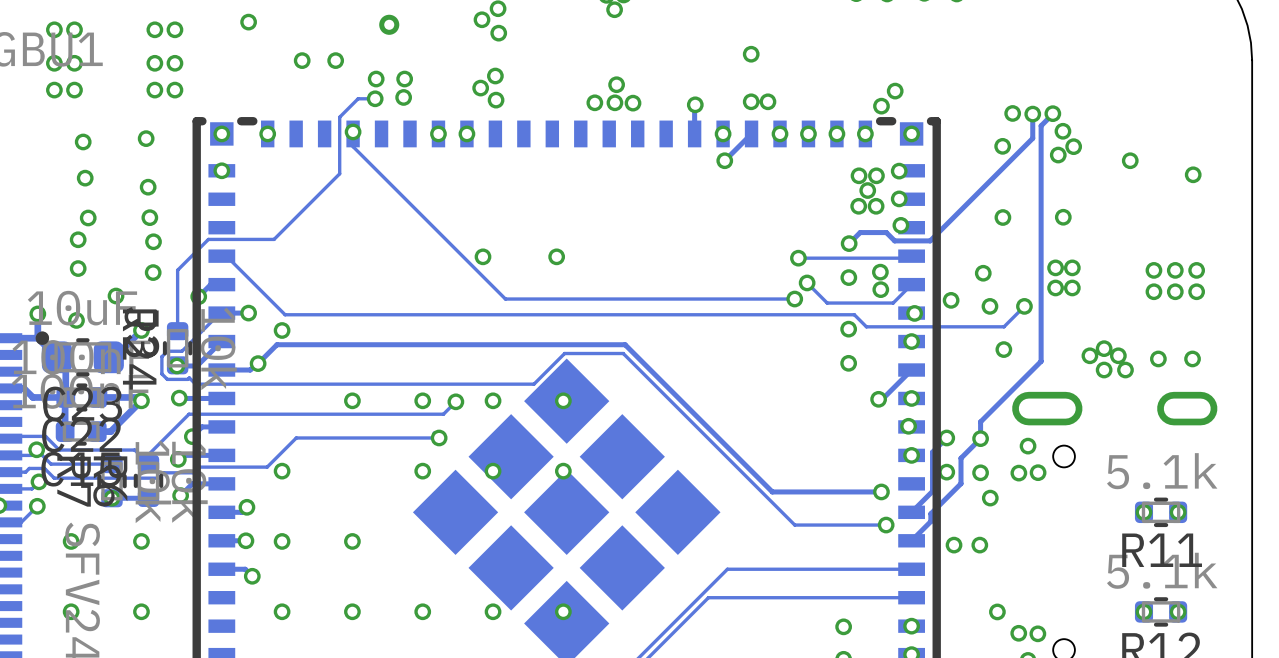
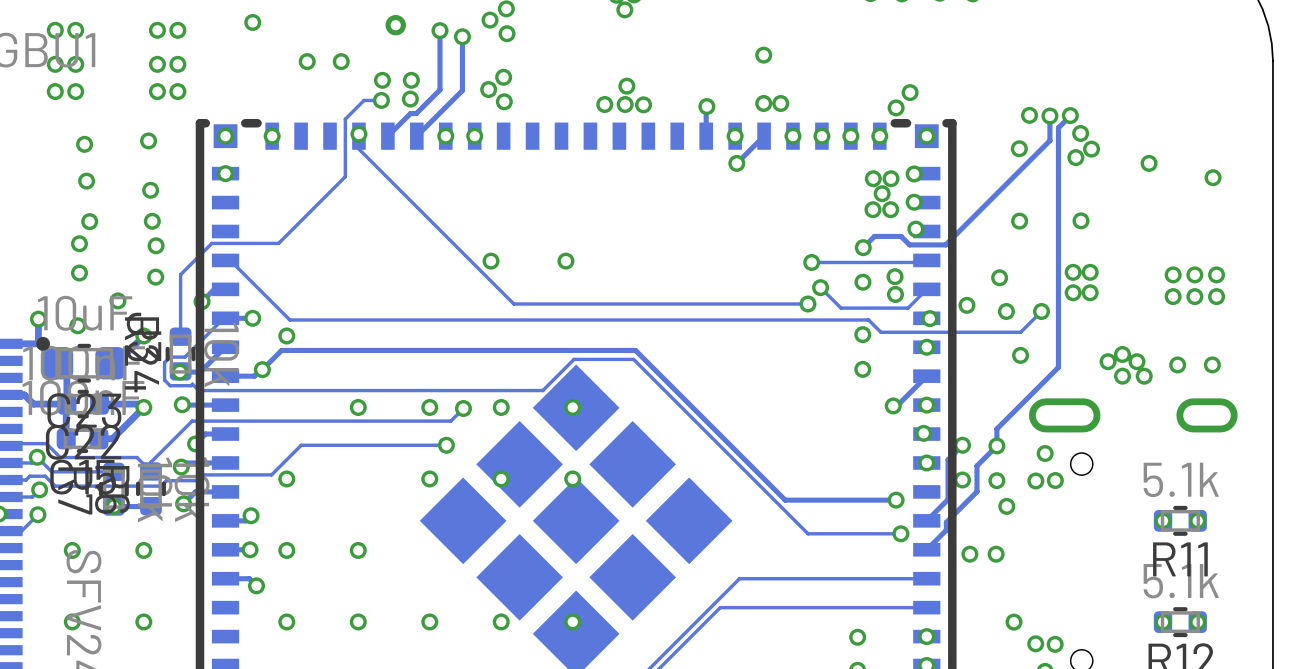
track: none -> (439, 30) (439, 89) (416, 113) (410, 113) (387, 136)
via: none -> (439, 30)
track: none -> (462, 36) (462, 90) (416, 136)
via: none -> (462, 36)

